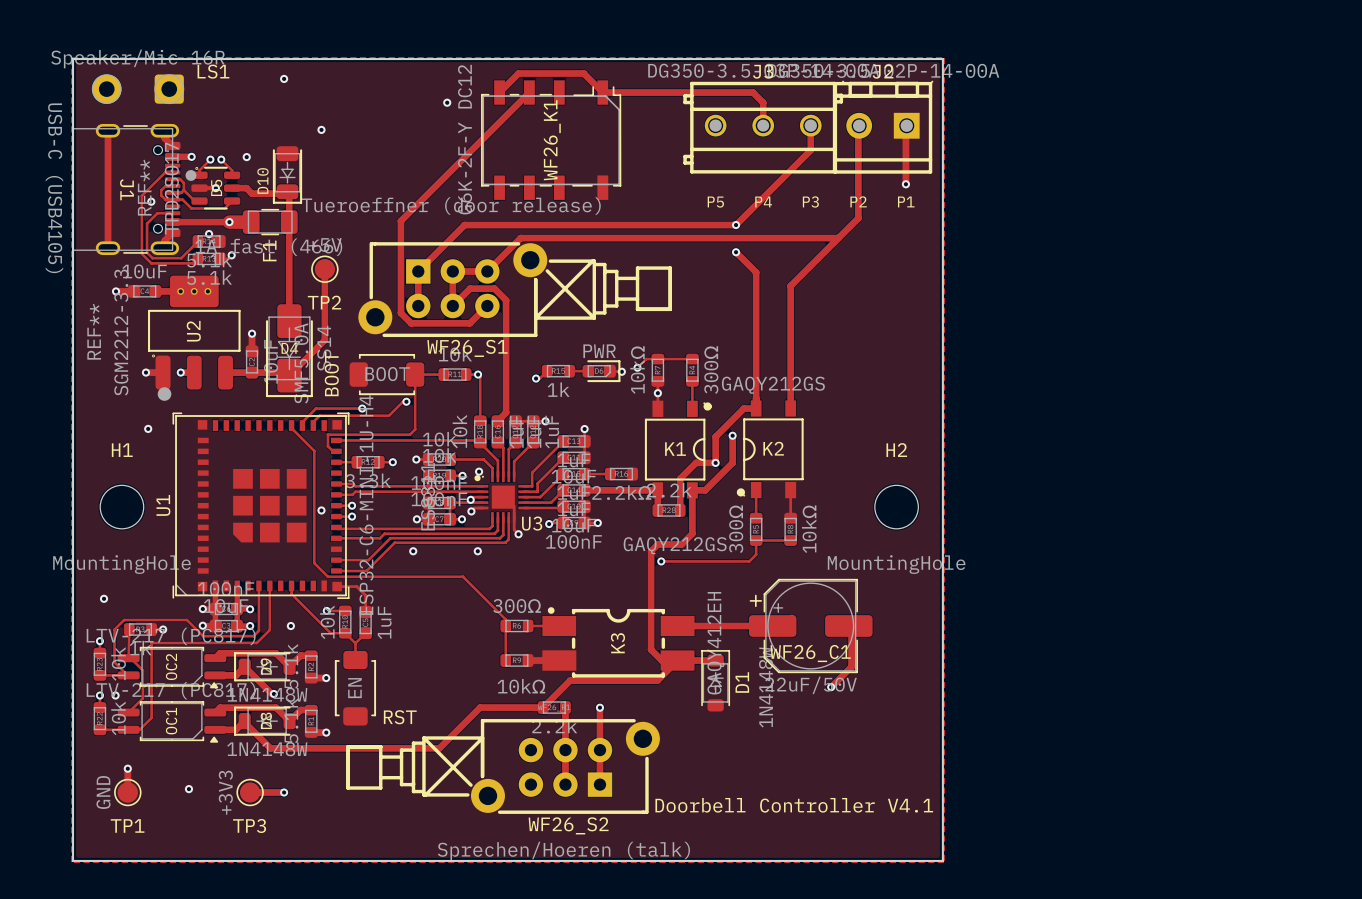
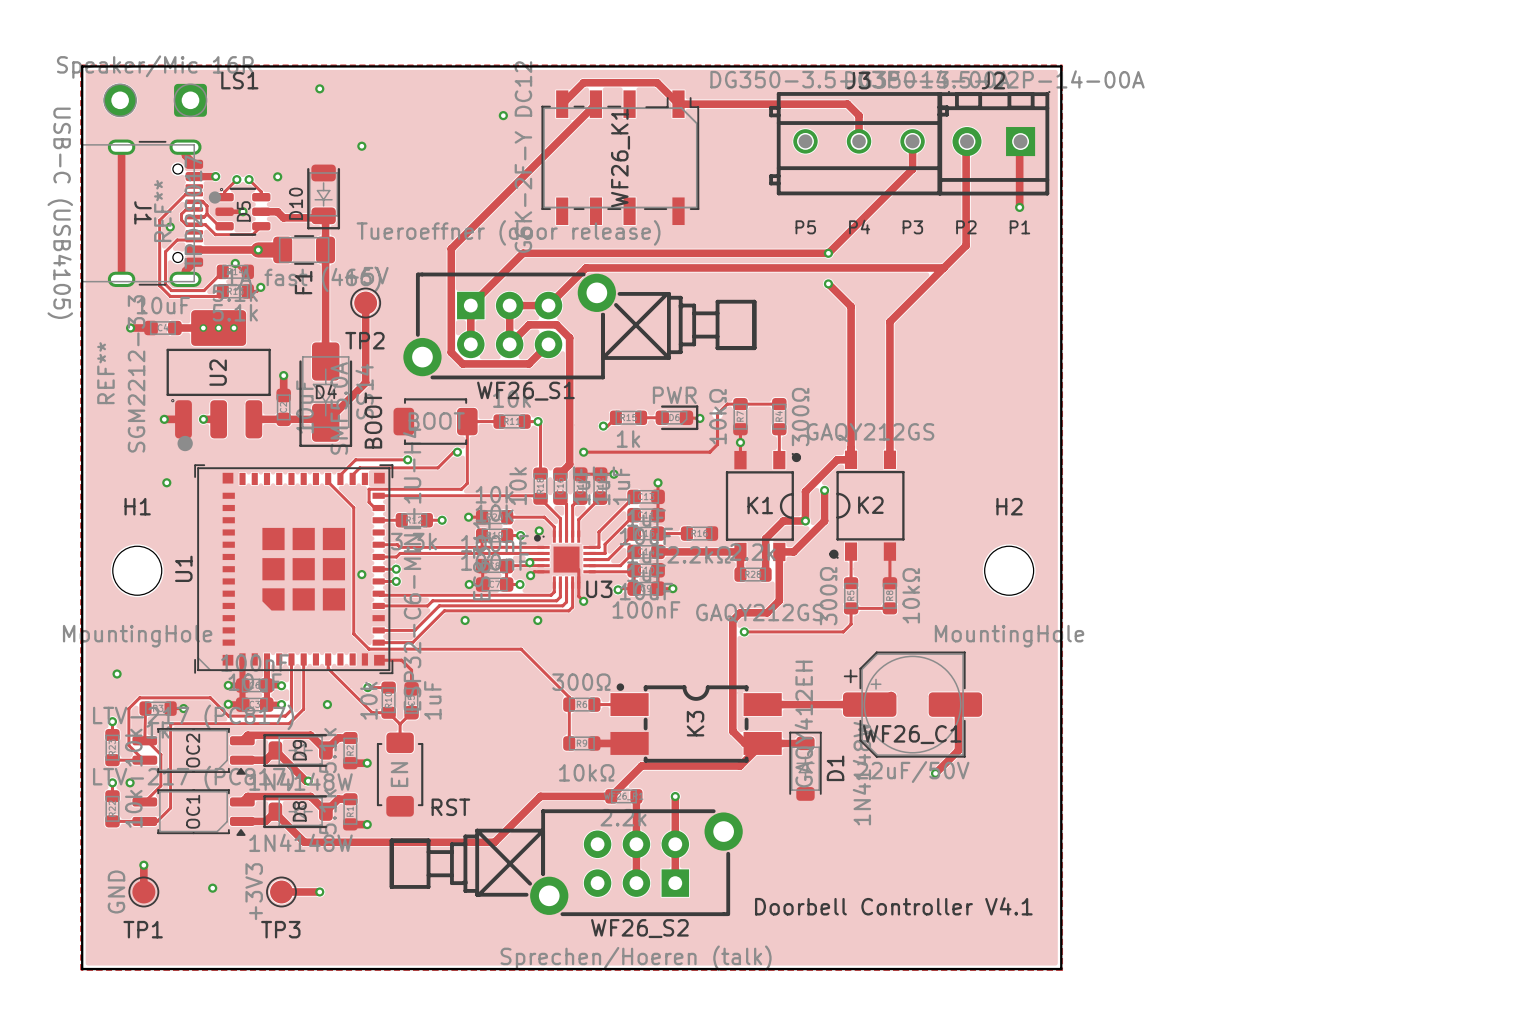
track: none -> (717, 413) (717, 444) (709, 452) (583, 452)
via: (637, 367) -> none
via: none -> (583, 452)

